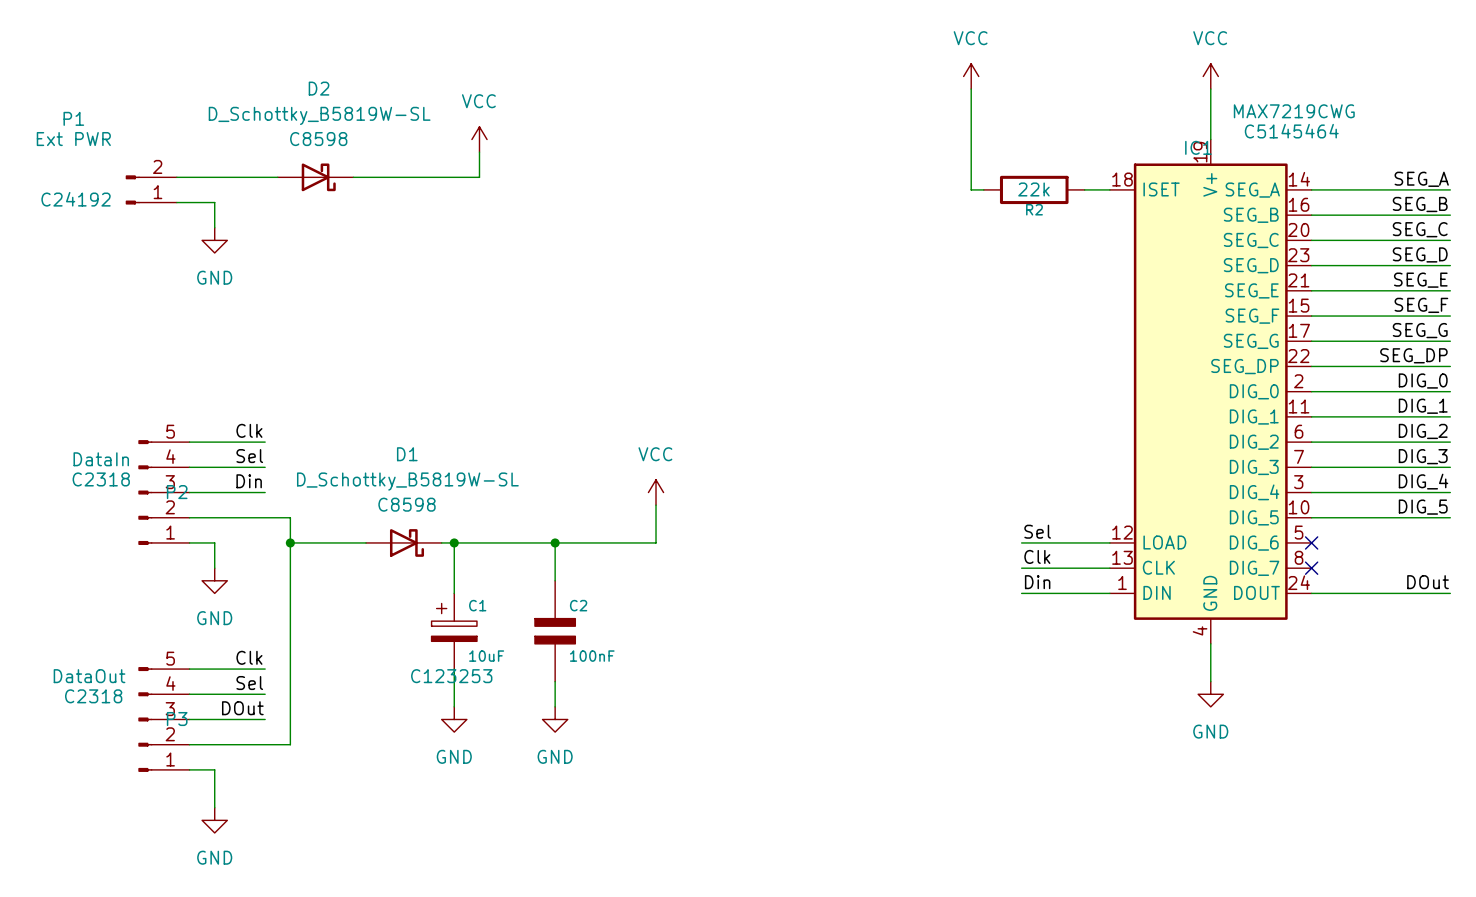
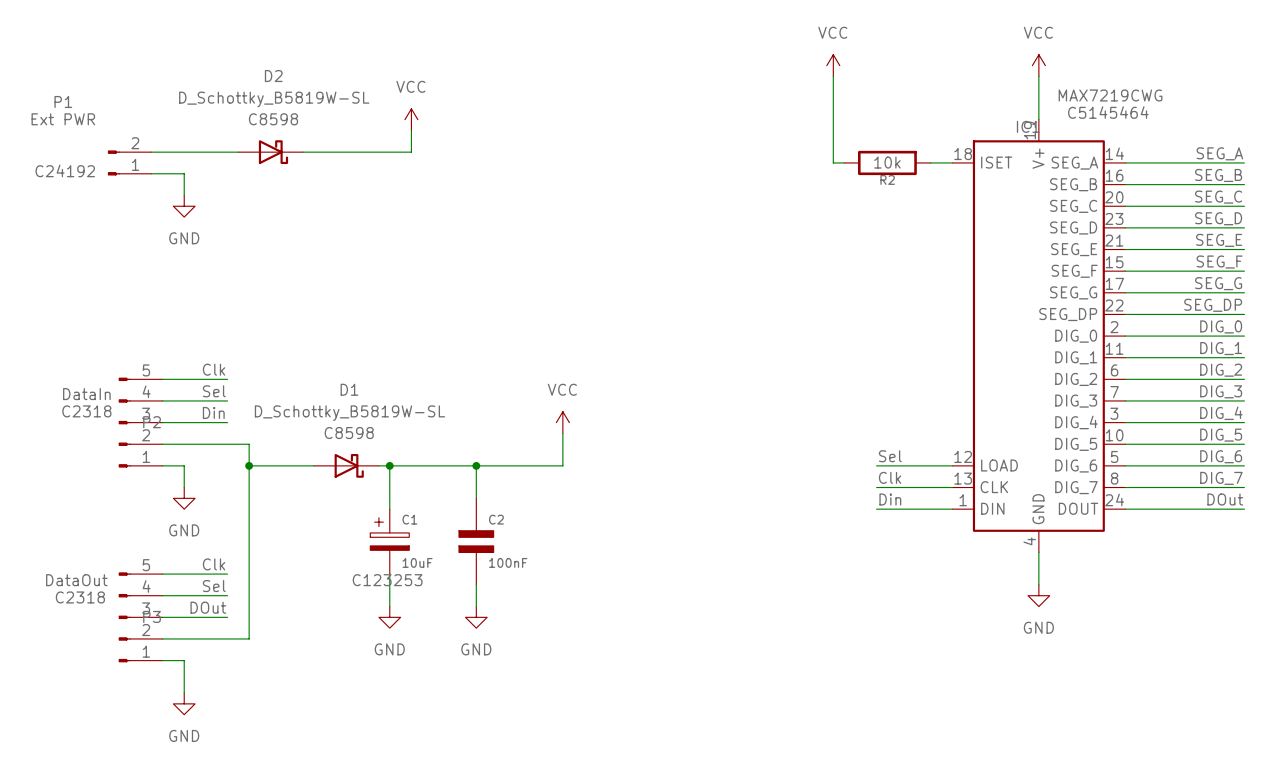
R2 value: 22k (1033, 189) -> 10k (887, 162)
label: none -> DIG_6 (1221, 456)
wire: none -> (1125, 465) (1244, 465)
no-connect mark: (1311, 542) -> none
label: none -> DIG_7 (1221, 478)
wire: none -> (1125, 487) (1244, 487)
no-connect mark: (1311, 568) -> none

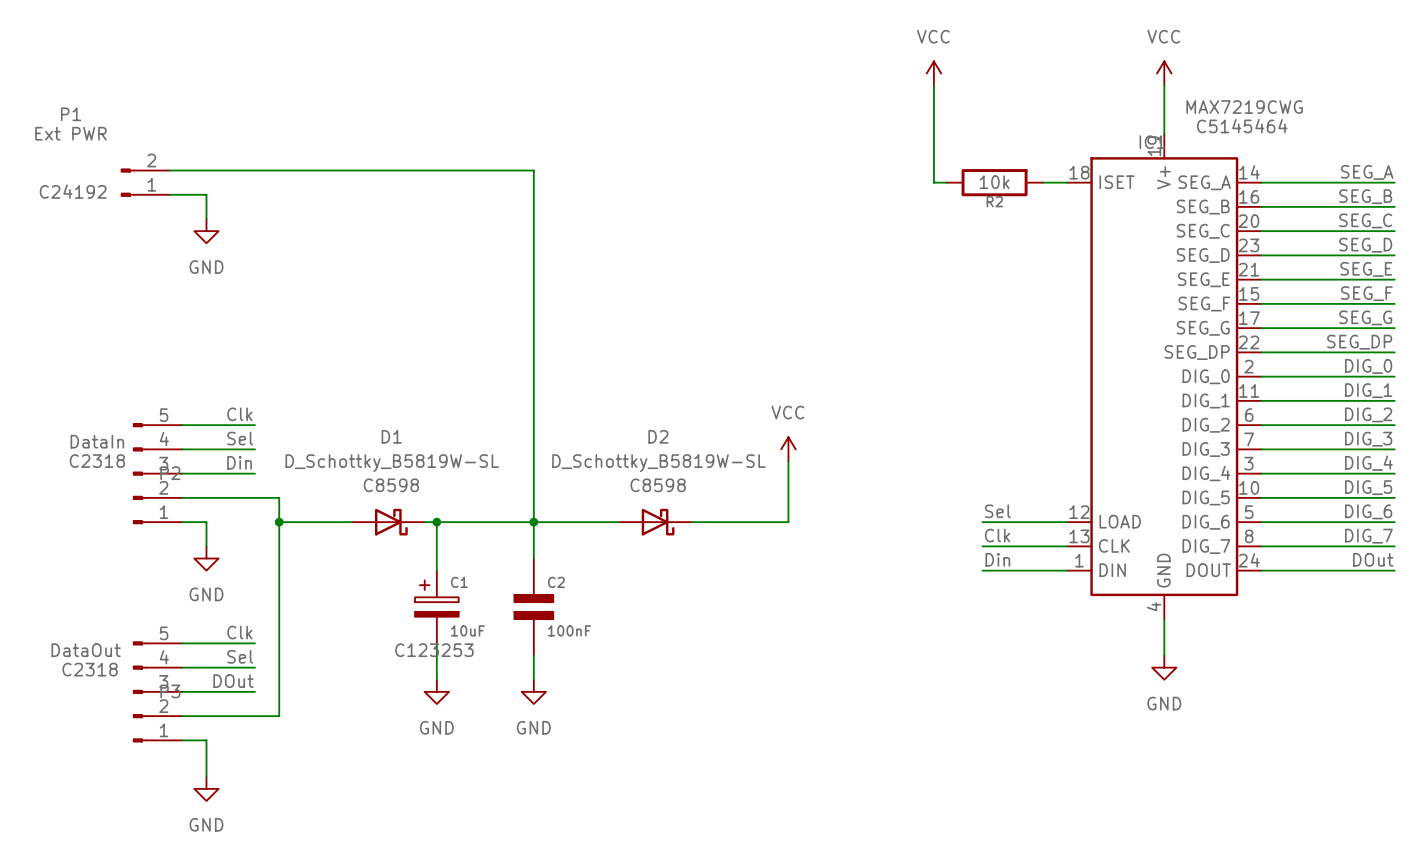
power symbol: VCC (411, 119) -> none
wire: (411, 130) (411, 152) -> (533, 522) (533, 170) (461, 170)
D2 position: (270, 152) -> (655, 522)
wire: none -> (788, 461) (788, 522) (691, 522)
power symbol position: VCC (562, 422) -> VCC (788, 449)
wire: (562, 433) (562, 465) (552, 465) -> none

